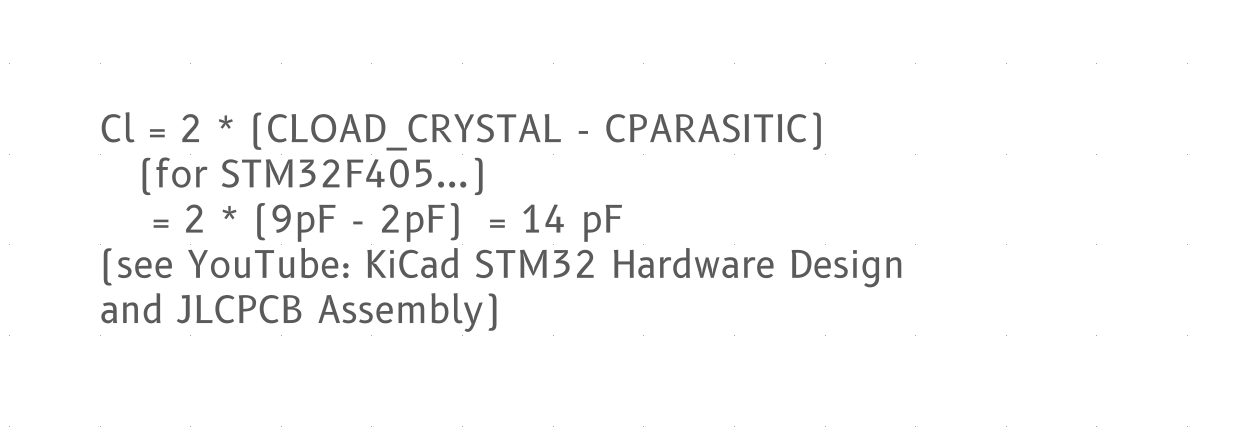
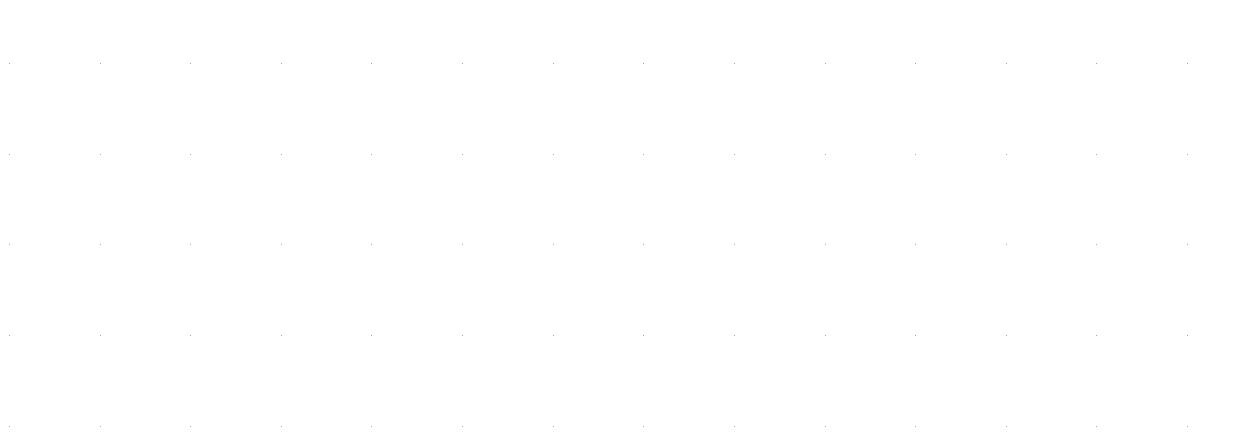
text: Cl = 2 * (CLOAD_CRYSTAL - CPARASITIC) (461, 131) -> none
text: (for STM32F405...) (312, 176) -> none
text: = 2 * (9pF - 2pF) = 14 pF (387, 222) -> none
text: (see YouTube: KiCad STM32 Hardware Design (502, 267) -> none
text: and JLCPCB Assembly) (298, 312) -> none

